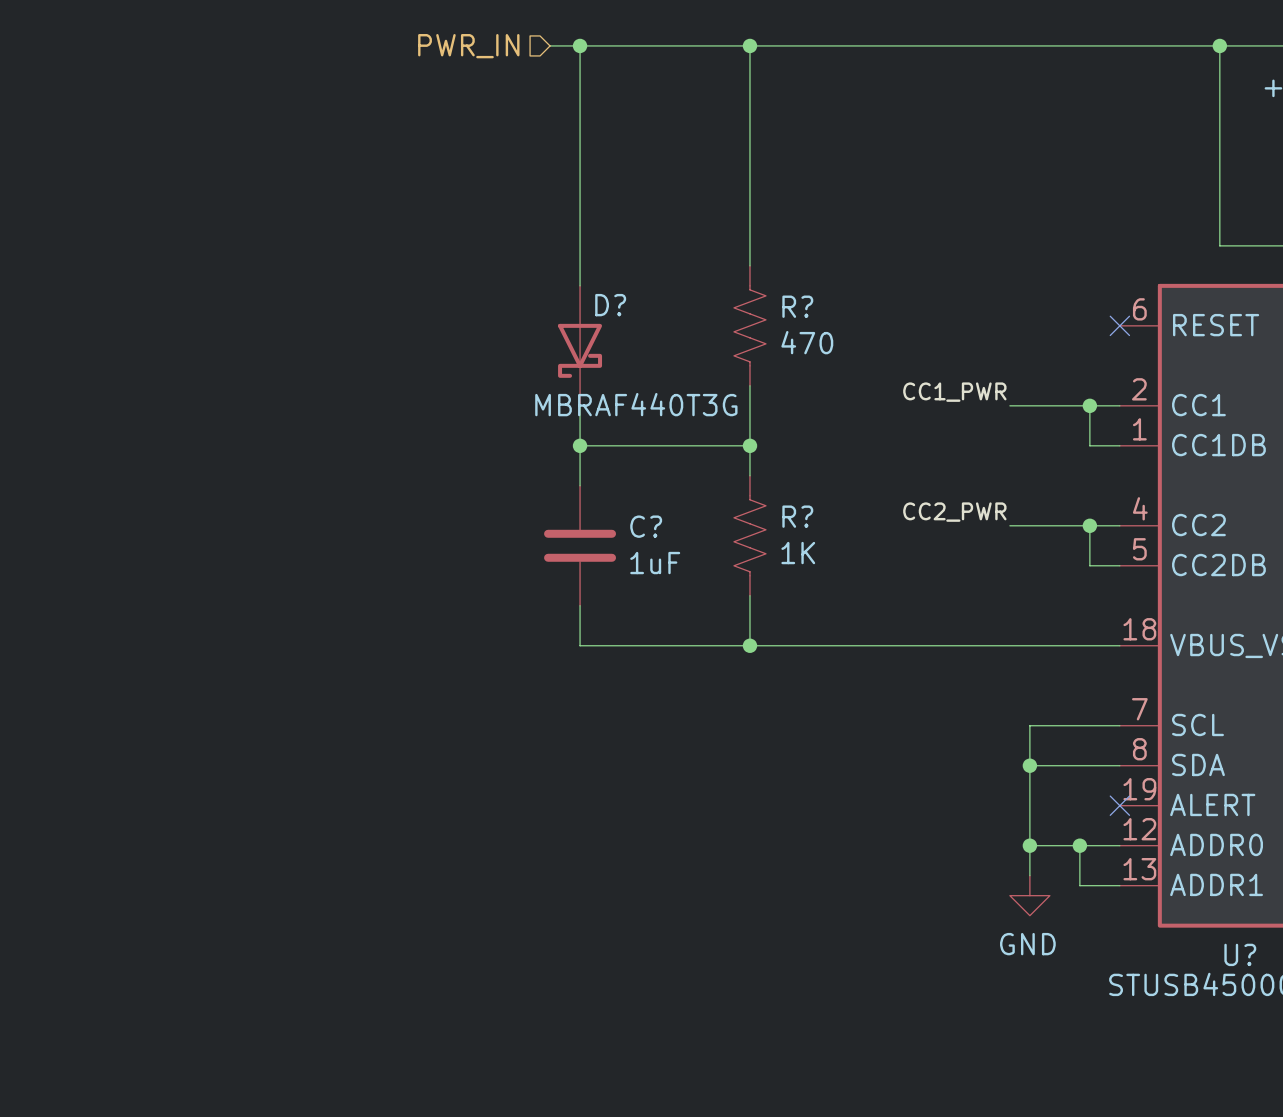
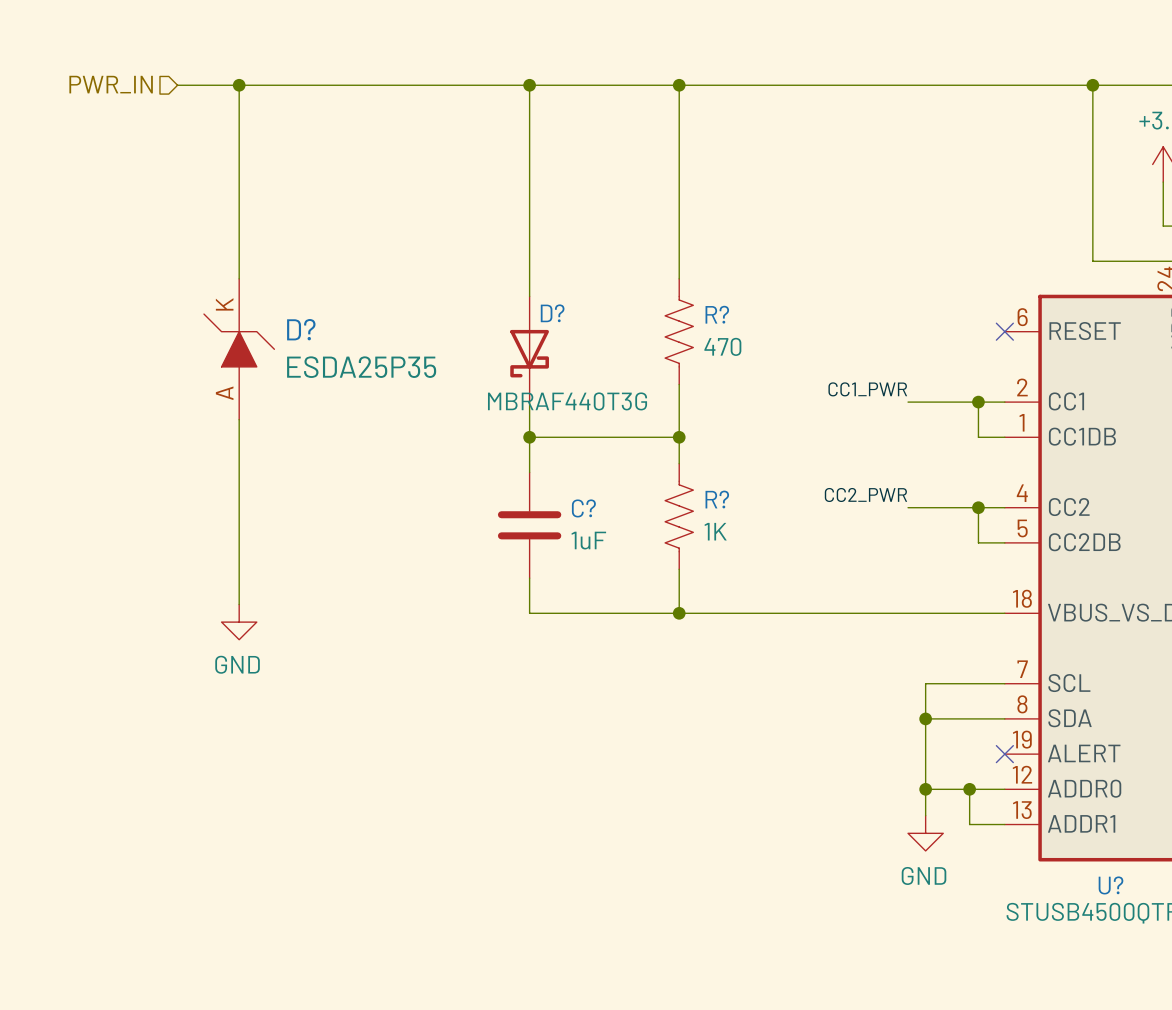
wire: none -> (177, 85) (503, 85)
wire: none -> (239, 85) (239, 278)
junction: none -> (239, 85)
hierarchical label position: PWR_IN (468, 46) -> PWR_IN (111, 84)
D?: none -> ESDA25P35 (239, 349)
wire: none -> (239, 419) (239, 604)
power symbol: none -> GND (239, 622)

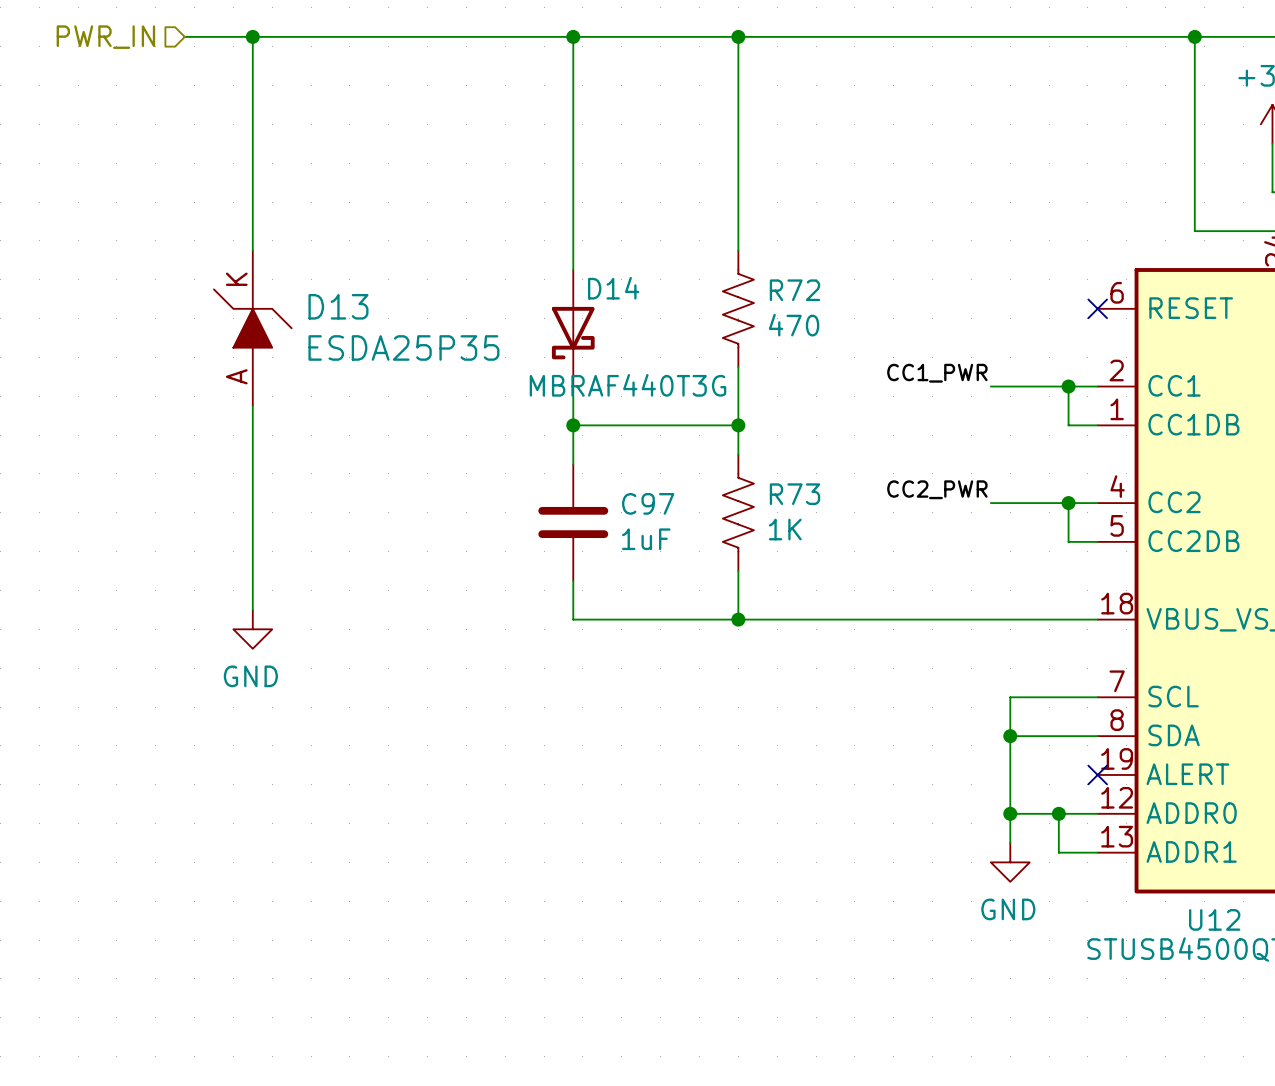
D? name: D? (552, 313) -> D14 (613, 288)
R? name: R? (717, 314) -> R72 (794, 290)
D? name: D? (301, 329) -> D13 (338, 306)
R? name: R? (717, 499) -> R73 (794, 494)
C? name: C? (583, 508) -> C97 (648, 503)
U? name: U? (1111, 885) -> U12 (1214, 919)

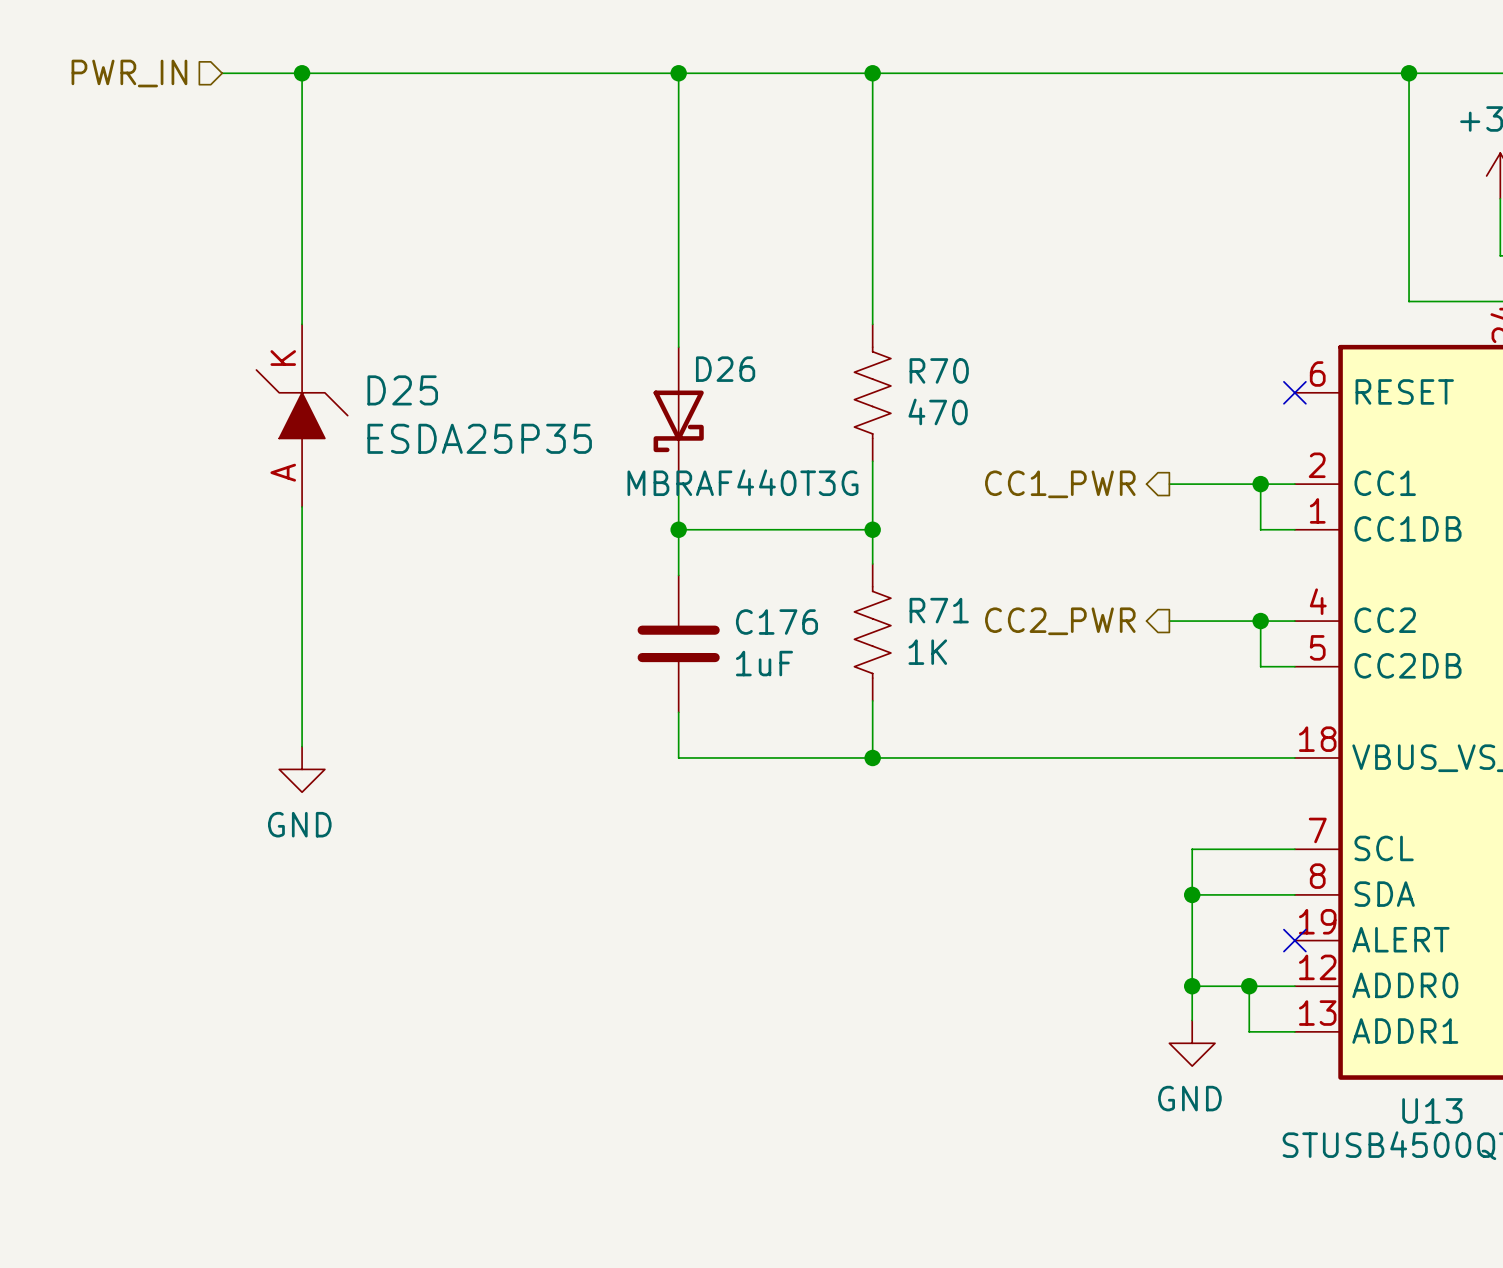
D14 name: D14 (613, 288) -> D26 (725, 369)
R72 name: R72 (794, 290) -> R70 (939, 370)
D13 name: D13 (338, 306) -> D25 (402, 390)
label: CC1_PWR (937, 373) -> none
hierarchical label: none -> CC1_PWR (1060, 484)
label: CC2_PWR (937, 489) -> none
R73 name: R73 (794, 494) -> R71 (939, 610)
C97 name: C97 (648, 503) -> C176 (776, 622)
hierarchical label: none -> CC2_PWR (1060, 621)
U12 name: U12 (1214, 919) -> U13 (1432, 1110)

